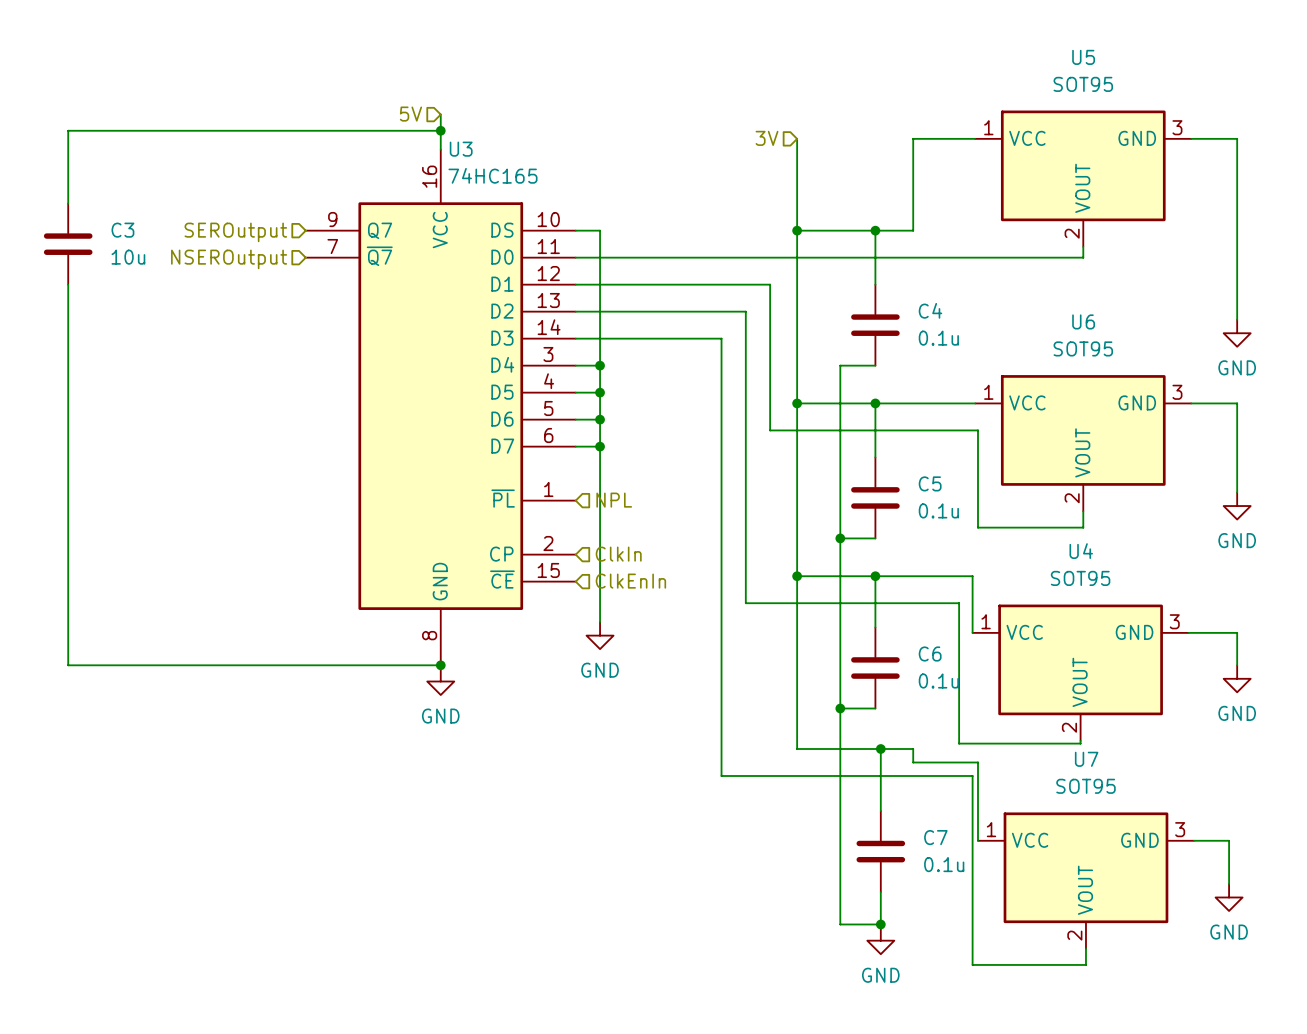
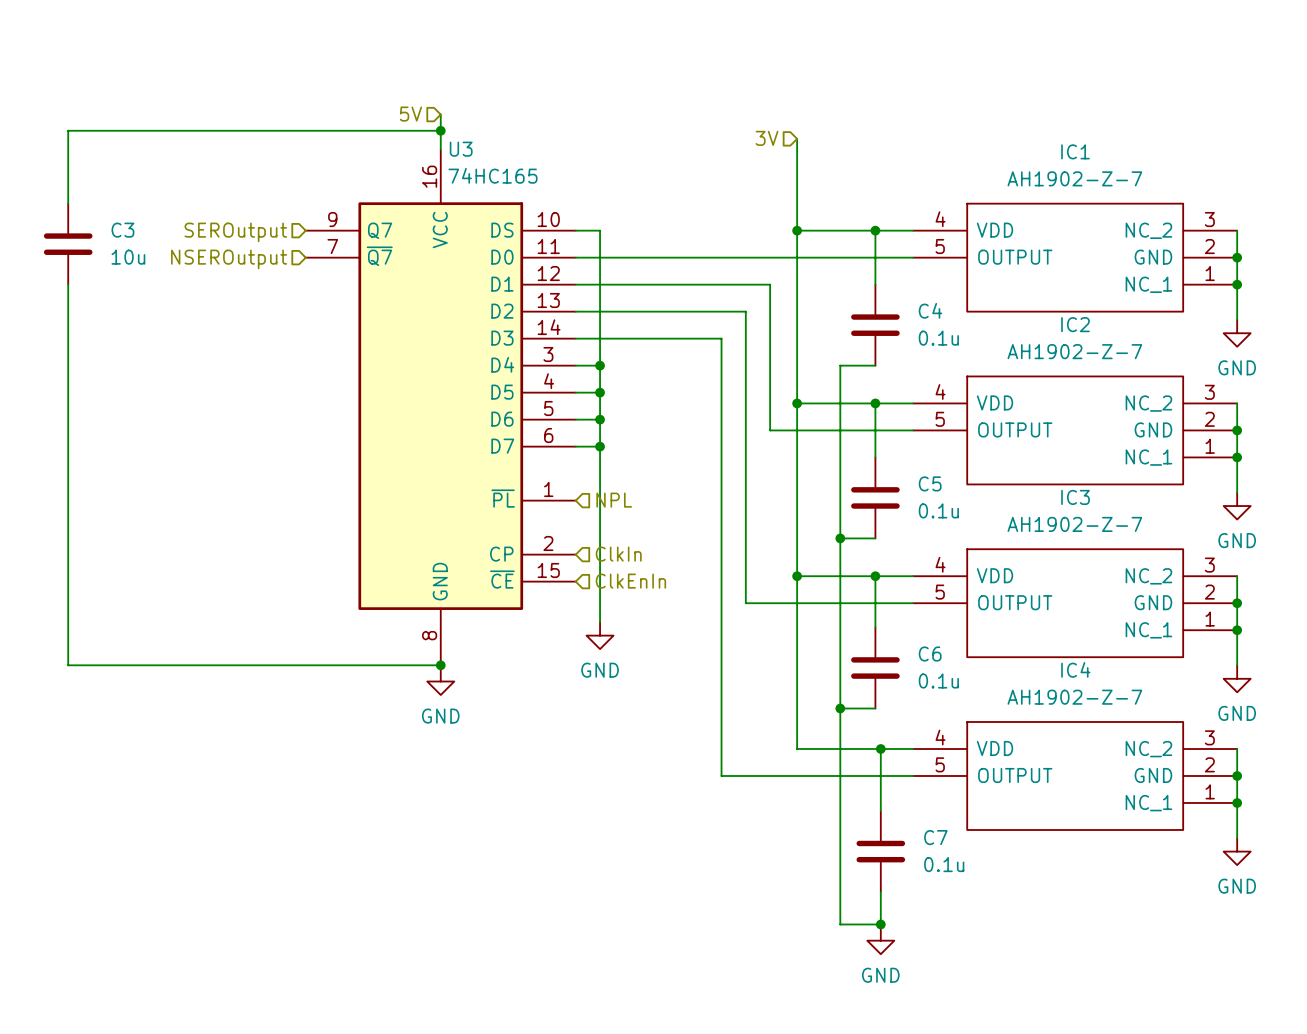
wire: (975, 138) (913, 138) (913, 230) -> none
wire: (1191, 138) (1237, 138) (1237, 230) -> none
U5: SOT95 (1083, 178) -> none
wire: (1083, 246) (1083, 257) (913, 257) -> none
IC1: none -> AH1902-Z-7 (1075, 257)
junction: none -> (1237, 257)
junction: none -> (1237, 284)
wire: (913, 430) (978, 430) (978, 527) (1083, 527) (1083, 511) -> none
IC2: none -> AH1902-Z-7 (1075, 430)
junction: none -> (1237, 430)
U6: SOT95 (1083, 443) -> none
junction: none -> (1237, 457)
wire: (913, 576) (972, 576) (972, 632) -> none
wire: (913, 603) (959, 603) (959, 743) (1080, 743) (1080, 740) -> none
IC3: none -> AH1902-Z-7 (1075, 603)
junction: none -> (1237, 603)
junction: none -> (1237, 630)
wire: (1188, 632) (1237, 632) -> (1237, 576) (1237, 632)
U4: SOT95 (1080, 672) -> none
wire: (913, 749) (913, 762) (978, 762) (978, 840) -> none
wire: none -> (1237, 749) (1237, 838)
wire: (913, 775) (972, 775) (972, 964) (1085, 964) (1085, 948) -> none
IC4: none -> AH1902-Z-7 (1075, 775)
junction: none -> (1237, 775)
junction: none -> (1237, 802)
wire: (1193, 840) (1229, 840) (1229, 883) -> none
U7: SOT95 (1085, 880) -> none
power symbol position: GND (1229, 897) -> GND (1237, 851)

